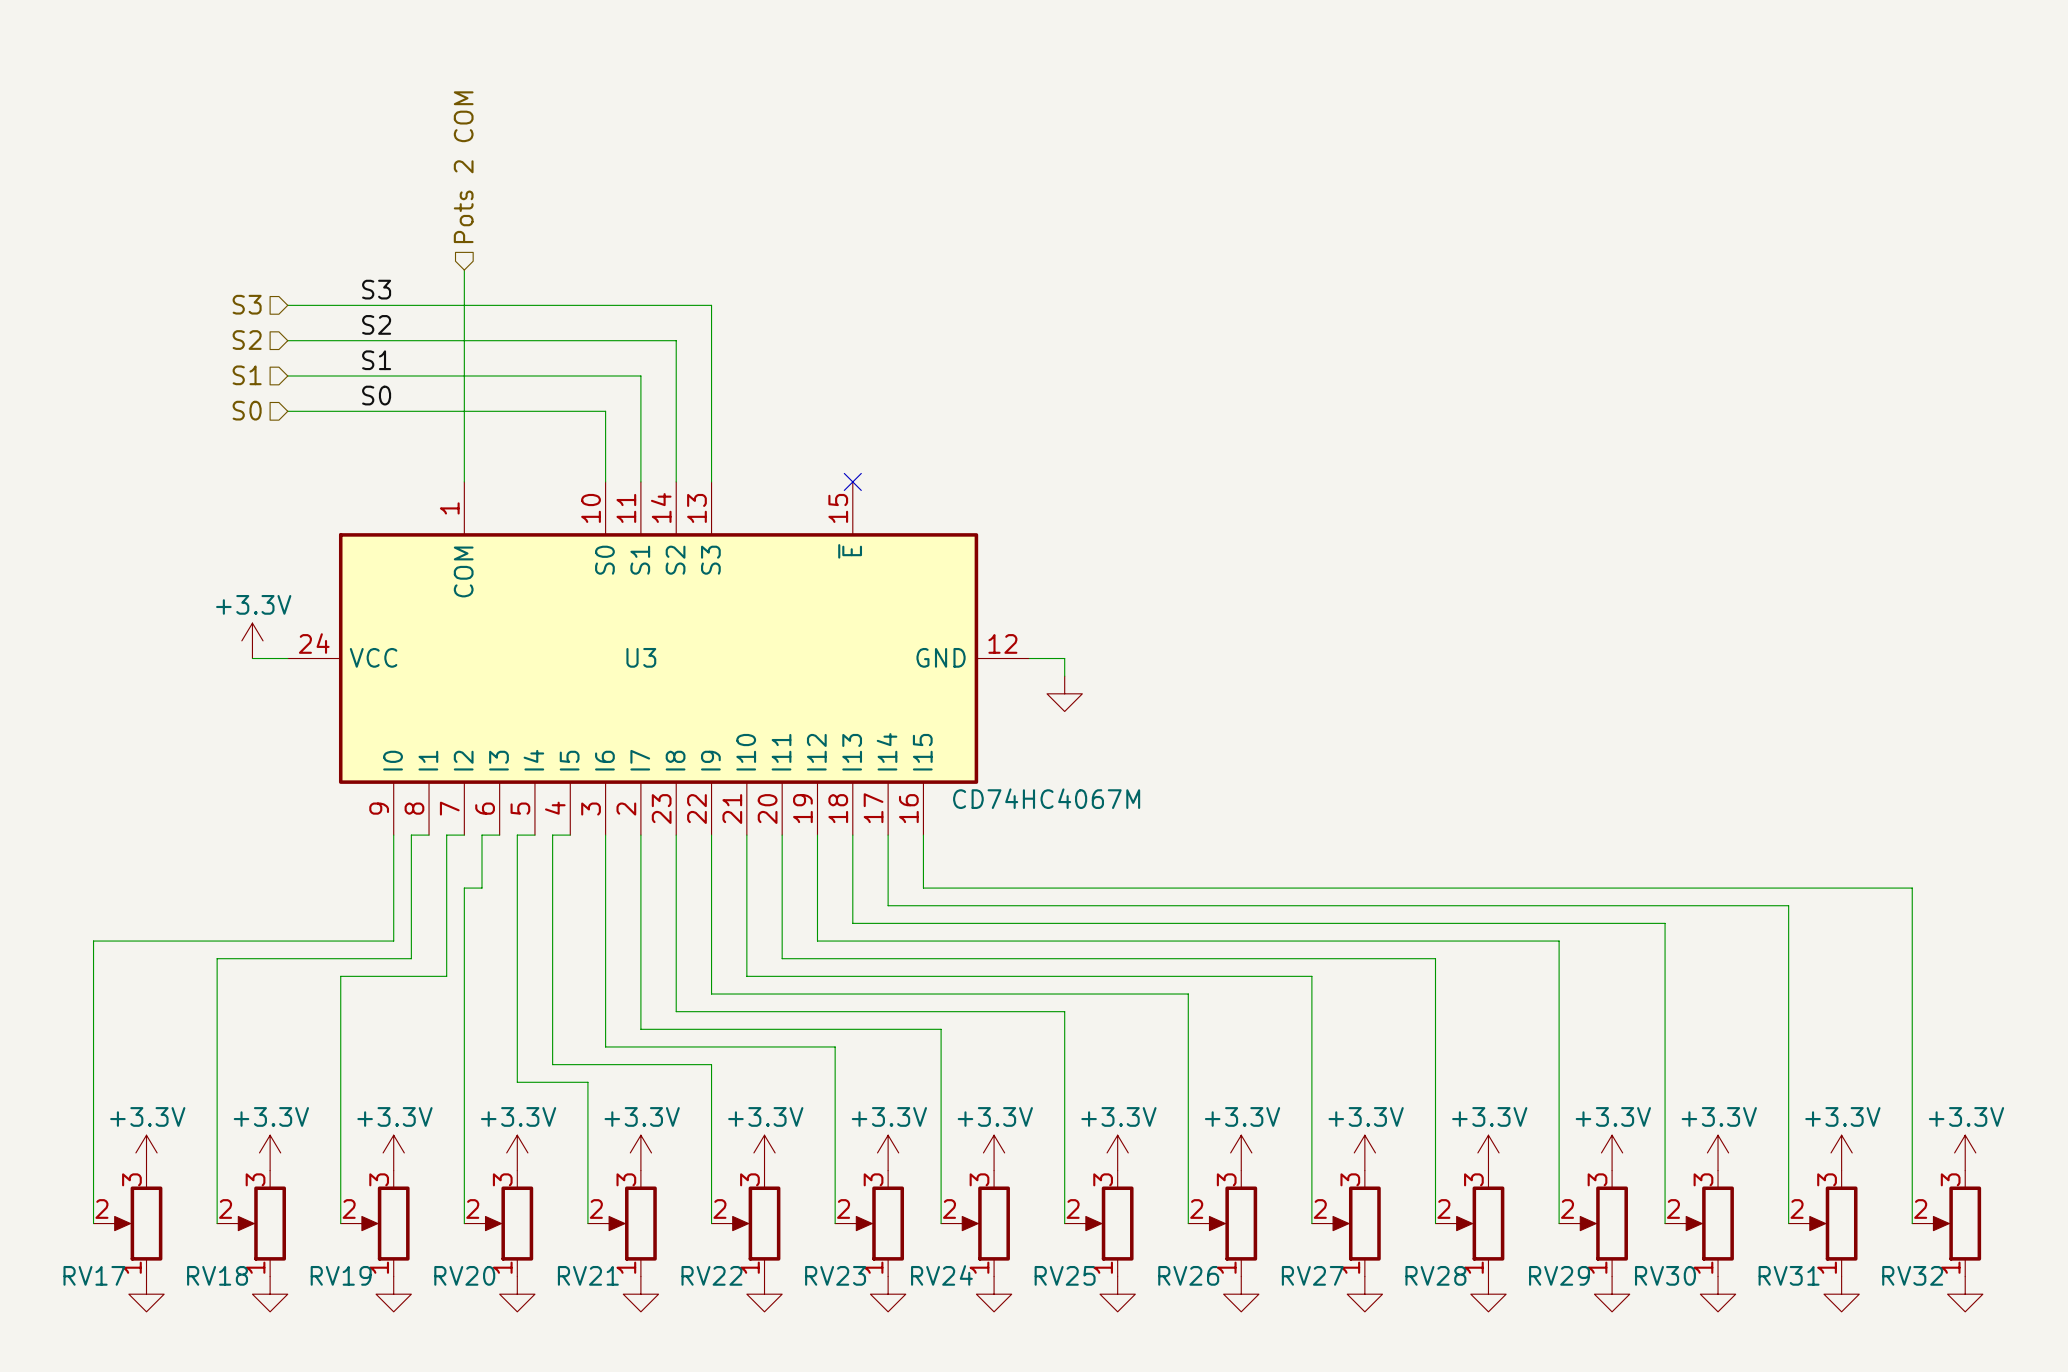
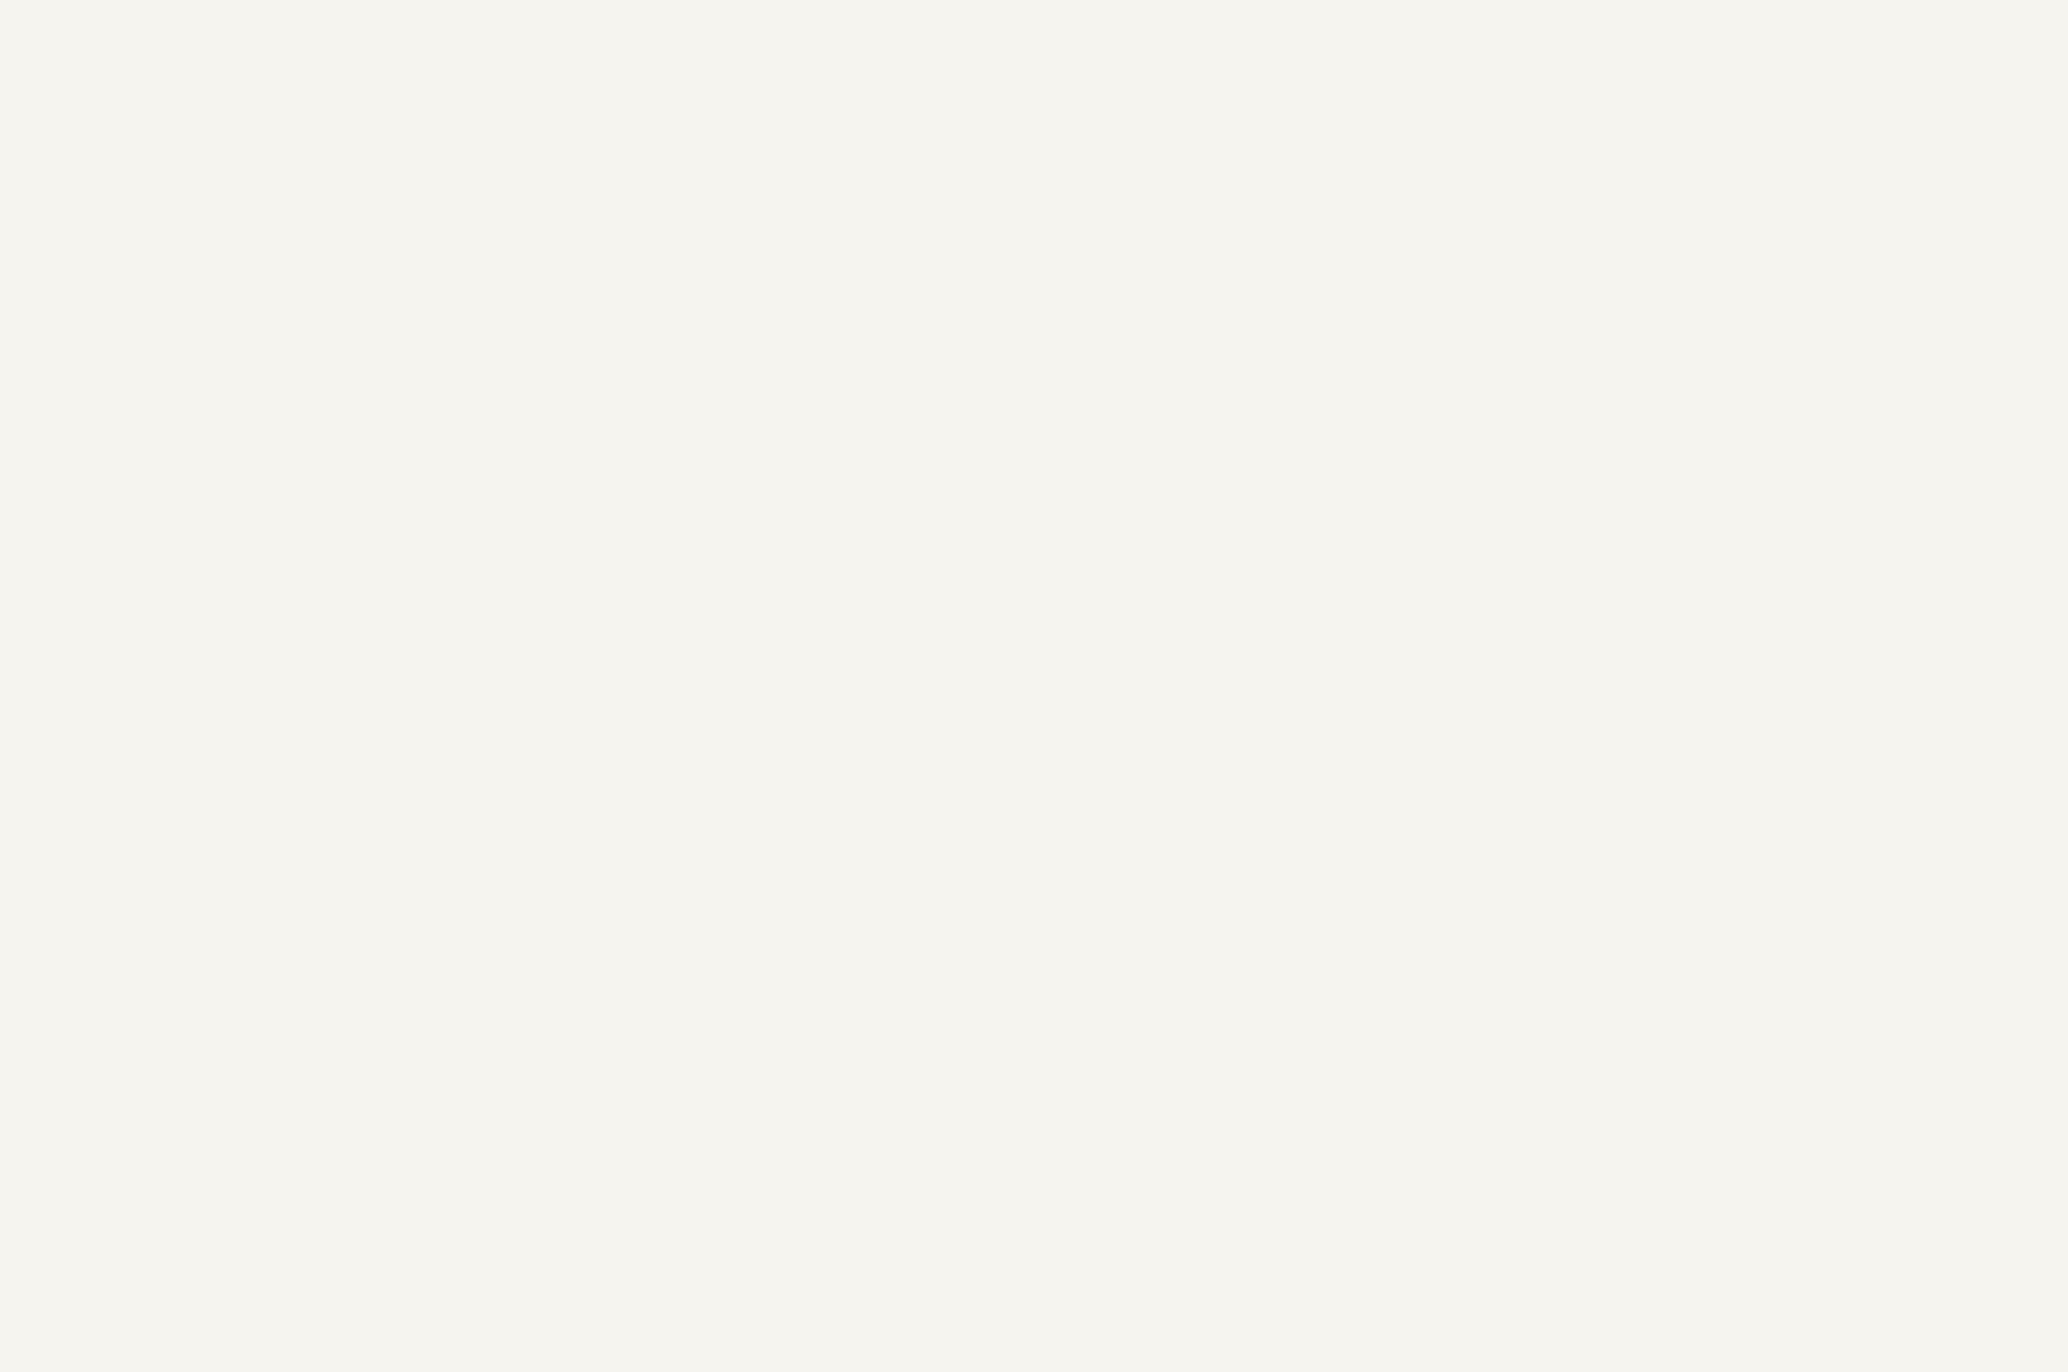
hierarchical label: Pots 2 COM (463, 167) -> none
wire: (464, 270) (464, 481) -> none
label: S3 (376, 289) -> none
hierarchical label: S3 (247, 304) -> none
wire: (287, 305) (711, 305) (711, 481) -> none
label: S2 (376, 324) -> none
hierarchical label: S2 (247, 340) -> none
wire: (287, 340) (676, 340) (676, 481) -> none
label: S1 (376, 360) -> none
hierarchical label: S1 (247, 375) -> none
wire: (287, 375) (640, 375) (640, 481) -> none
label: S0 (376, 395) -> none
hierarchical label: S0 (247, 410) -> none
wire: (287, 411) (605, 411) (605, 481) -> none
no-connect mark: (852, 481) -> none
power symbol: +3.3V (252, 640) -> none
wire: (252, 658) (287, 658) -> none
U3: CD74HC4067M (658, 658) -> none
wire: (1029, 658) (1064, 658) (1064, 676) -> none
power symbol: (1064, 693) -> none
wire: (393, 835) (393, 941) (93, 941) (93, 1223) -> none
wire: (429, 835) (411, 835) (411, 958) (217, 958) (217, 1223) -> none
wire: (464, 835) (446, 835) (446, 976) (340, 976) (340, 1223) -> none
wire: (499, 835) (481, 835) (481, 888) (464, 888) (464, 1223) -> none
wire: (534, 835) (517, 835) (517, 1082) (587, 1082) (587, 1223) -> none
wire: (570, 835) (552, 835) (552, 1064) (711, 1064) (711, 1223) -> none
wire: (605, 835) (605, 1046) (835, 1046) (835, 1223) -> none
wire: (640, 835) (640, 1029) (941, 1029) (941, 1223) -> none
wire: (676, 835) (676, 1011) (1064, 1011) (1064, 1223) -> none
wire: (711, 835) (711, 994) (1188, 994) (1188, 1223) -> none
wire: (746, 835) (746, 976) (1311, 976) (1311, 1223) -> none
wire: (782, 835) (782, 958) (1435, 958) (1435, 1223) -> none
wire: (817, 835) (817, 941) (1559, 941) (1559, 1223) -> none
wire: (852, 835) (852, 923) (1665, 923) (1665, 1223) -> none
wire: (888, 835) (888, 905) (1788, 905) (1788, 1223) -> none
wire: (923, 835) (923, 888) (1912, 888) (1912, 1223) -> none
power symbol: +3.3V (146, 1152) -> none
power symbol: +3.3V (270, 1152) -> none
power symbol: +3.3V (393, 1152) -> none
power symbol: +3.3V (517, 1152) -> none
power symbol: +3.3V (640, 1152) -> none
power symbol: +3.3V (764, 1152) -> none
power symbol: +3.3V (888, 1152) -> none
power symbol: +3.3V (994, 1152) -> none
power symbol: +3.3V (1117, 1152) -> none
power symbol: +3.3V (1241, 1152) -> none
power symbol: +3.3V (1364, 1152) -> none
power symbol: +3.3V (1488, 1152) -> none
power symbol: +3.3V (1612, 1152) -> none
power symbol: +3.3V (1718, 1152) -> none
power symbol: +3.3V (1841, 1152) -> none
power symbol: +3.3V (1965, 1152) -> none
RV17: (127, 1223) -> none
RV18: (251, 1223) -> none
RV19: (375, 1223) -> none
RV20: (498, 1223) -> none
RV21: (622, 1223) -> none
RV22: (745, 1223) -> none
RV23: (869, 1223) -> none
RV24: (975, 1223) -> none
RV25: (1099, 1223) -> none
RV26: (1222, 1223) -> none
RV27: (1346, 1223) -> none
RV28: (1469, 1223) -> none
RV29: (1593, 1223) -> none
RV30: (1699, 1223) -> none
RV31: (1823, 1223) -> none
RV32: (1946, 1223) -> none
power symbol: (146, 1294) -> none
power symbol: (270, 1294) -> none
power symbol: (393, 1294) -> none
power symbol: (517, 1294) -> none
power symbol: (640, 1294) -> none
power symbol: (764, 1294) -> none
power symbol: (888, 1294) -> none
power symbol: (994, 1294) -> none
power symbol: (1117, 1294) -> none
power symbol: (1241, 1294) -> none
power symbol: (1364, 1294) -> none
power symbol: (1488, 1294) -> none
power symbol: (1612, 1294) -> none
power symbol: (1718, 1294) -> none
power symbol: (1841, 1294) -> none
power symbol: (1965, 1294) -> none

